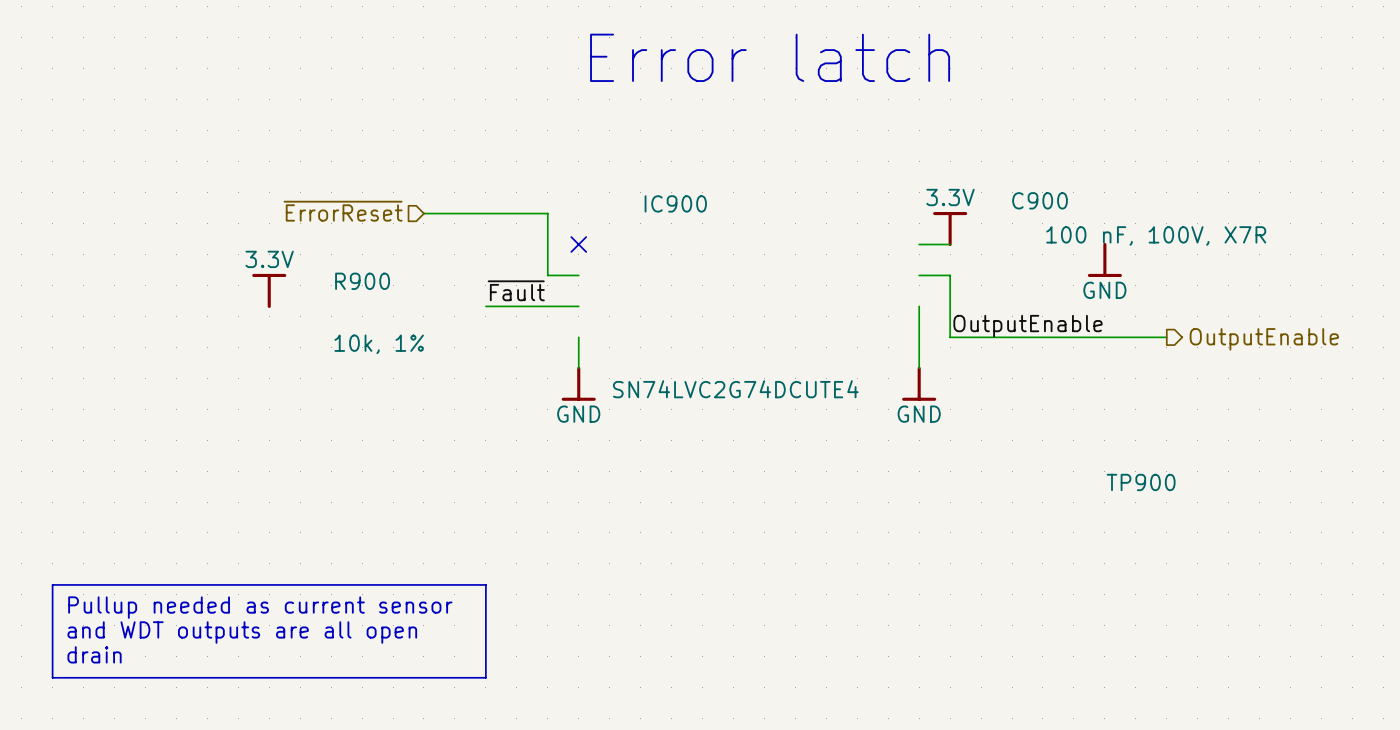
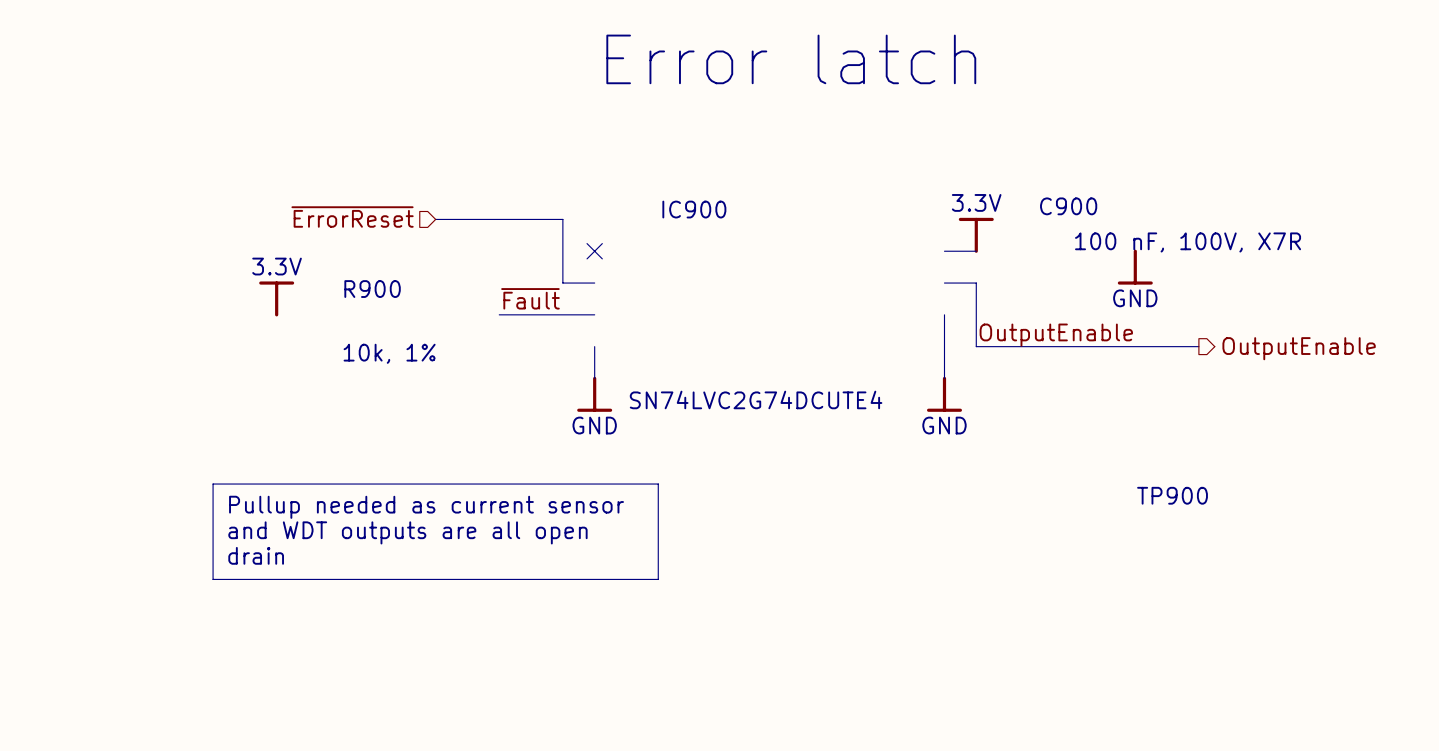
line: (52, 584) (485, 584) (485, 677) (52, 677) (52, 584) -> (213, 484) (658, 484) (658, 579) (213, 579) (213, 484)
text position: Pullup needed as current sensor (260, 607) -> Pullup needed as current sensor (426, 507)
text position: and WDT outputs are all open (242, 632) -> and WDT outputs are all open (407, 532)
text position: drain (94, 654) -> drain (256, 555)

